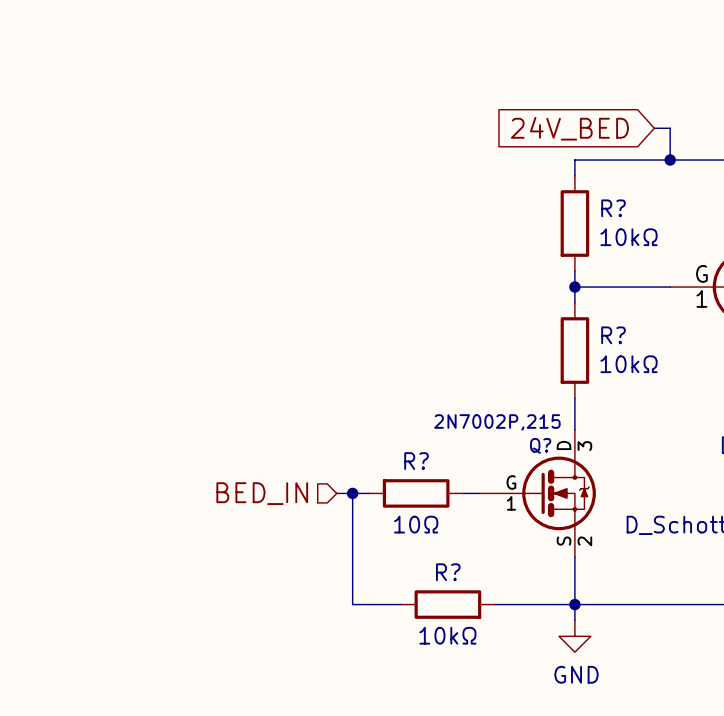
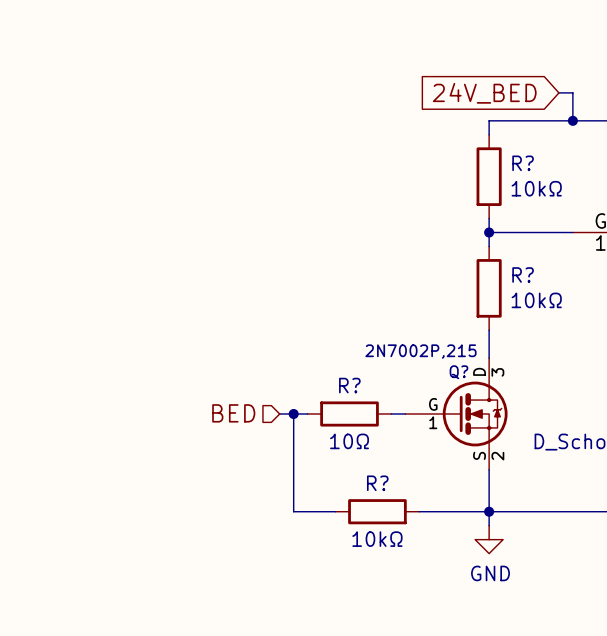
hierarchical label: BED_IN (262, 493) -> BED (233, 413)

